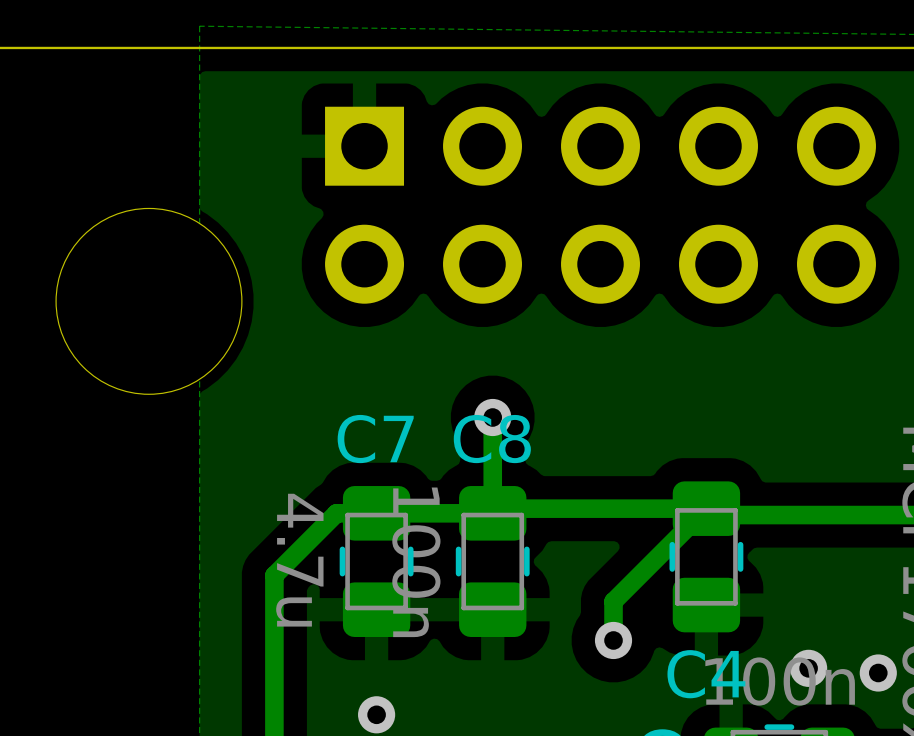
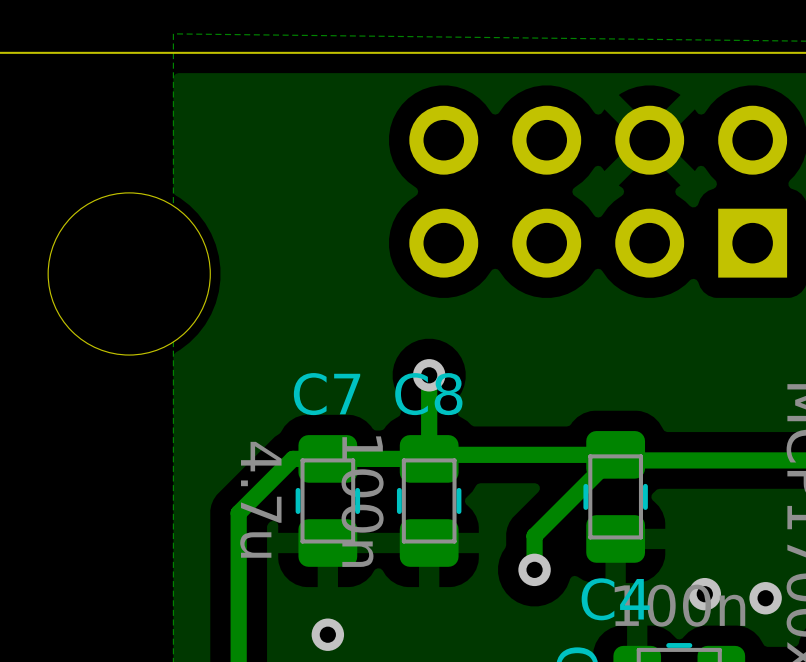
part: (600, 205) -> none
part: none -> (598, 191)

